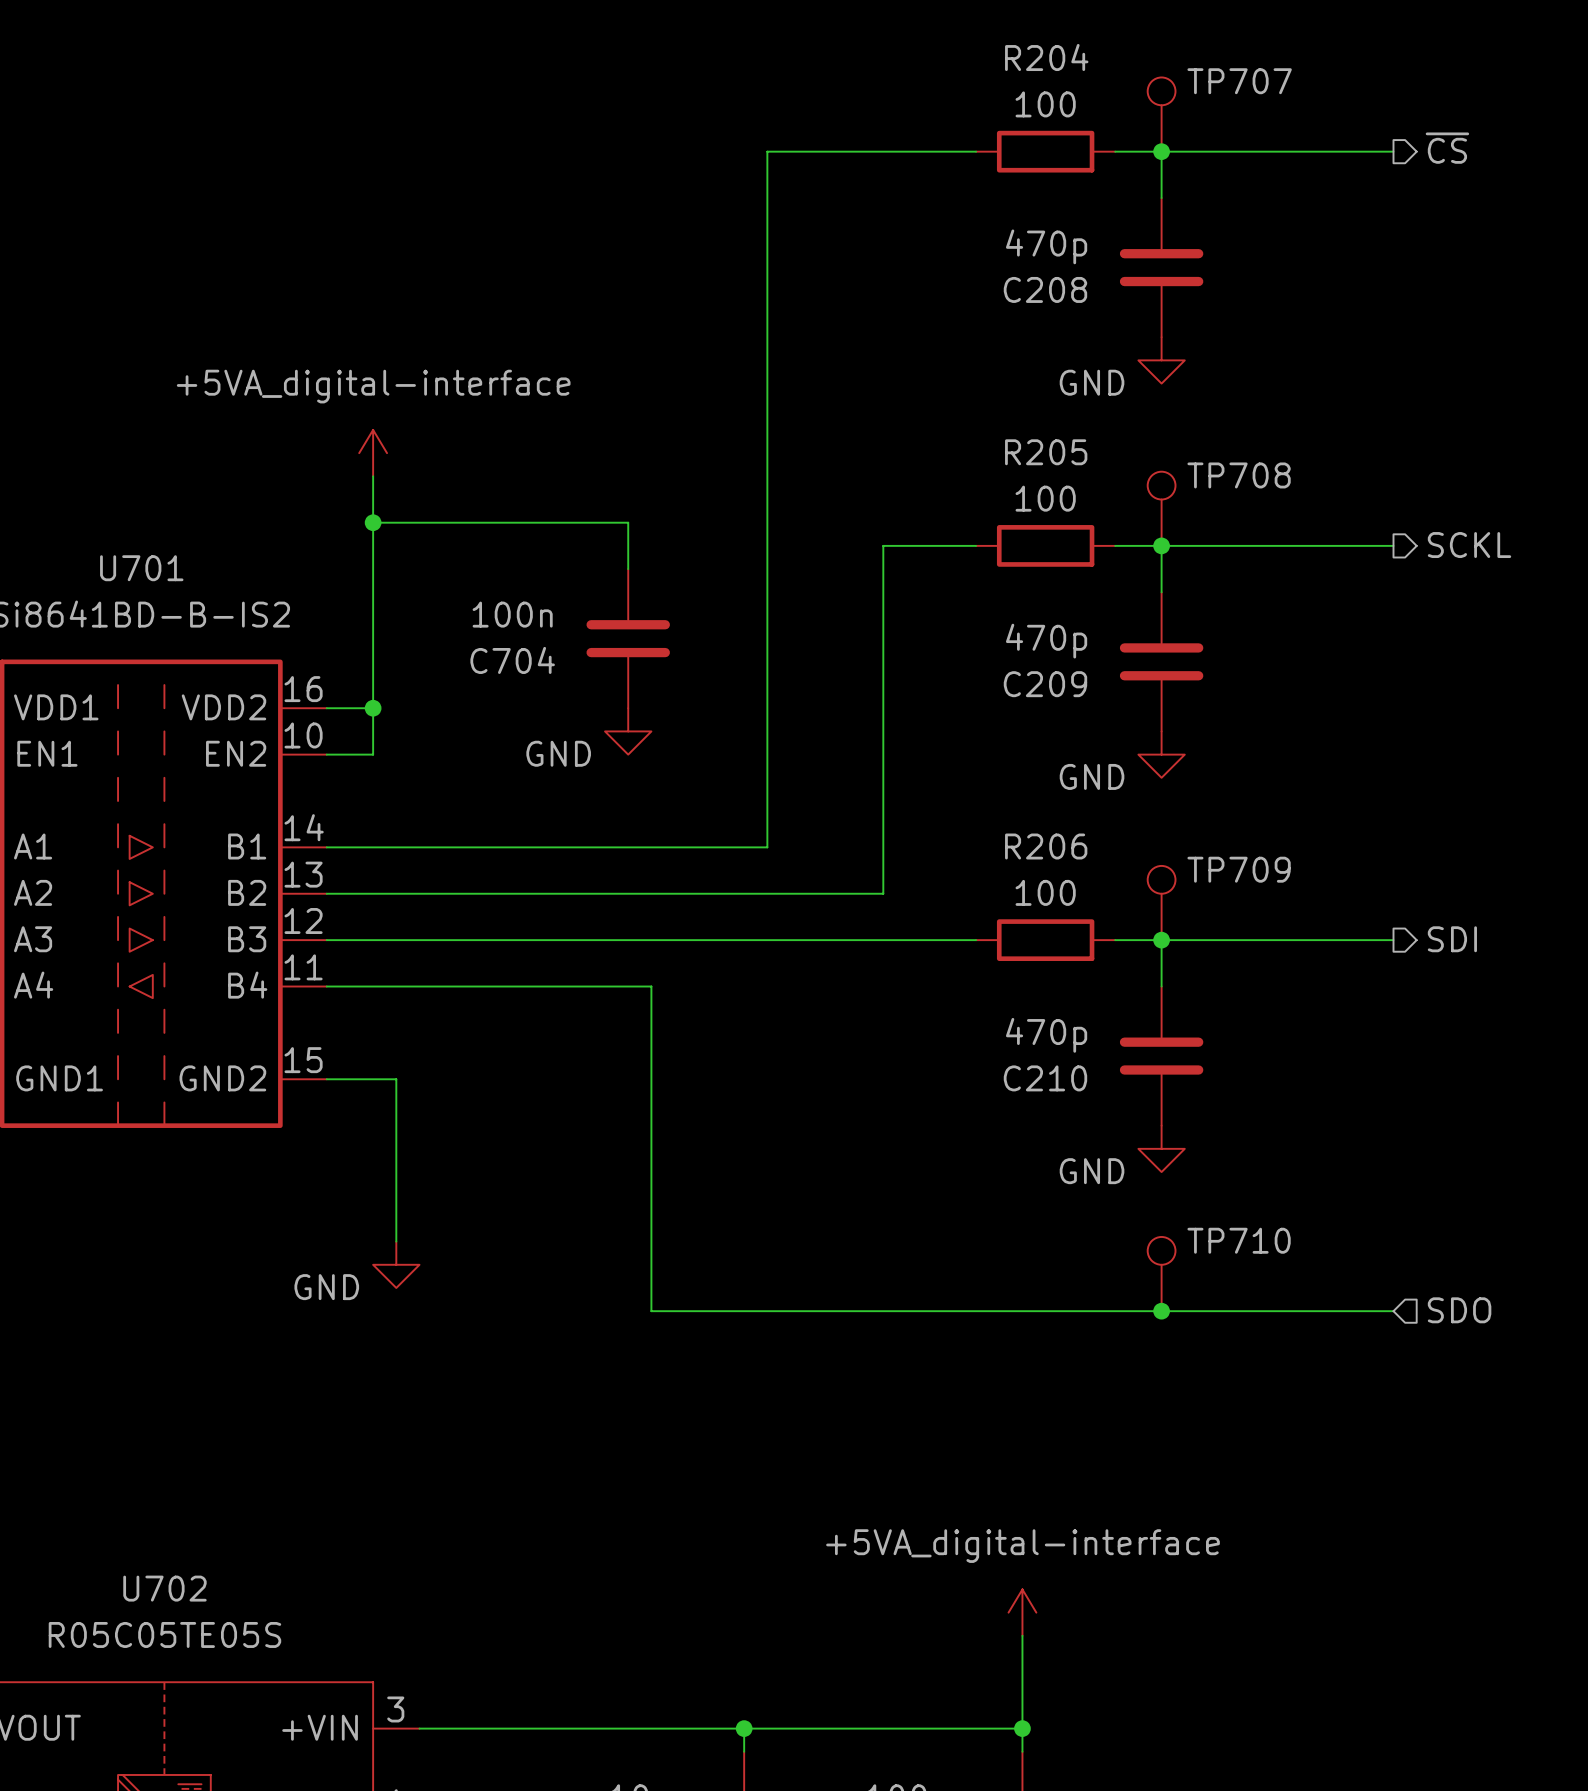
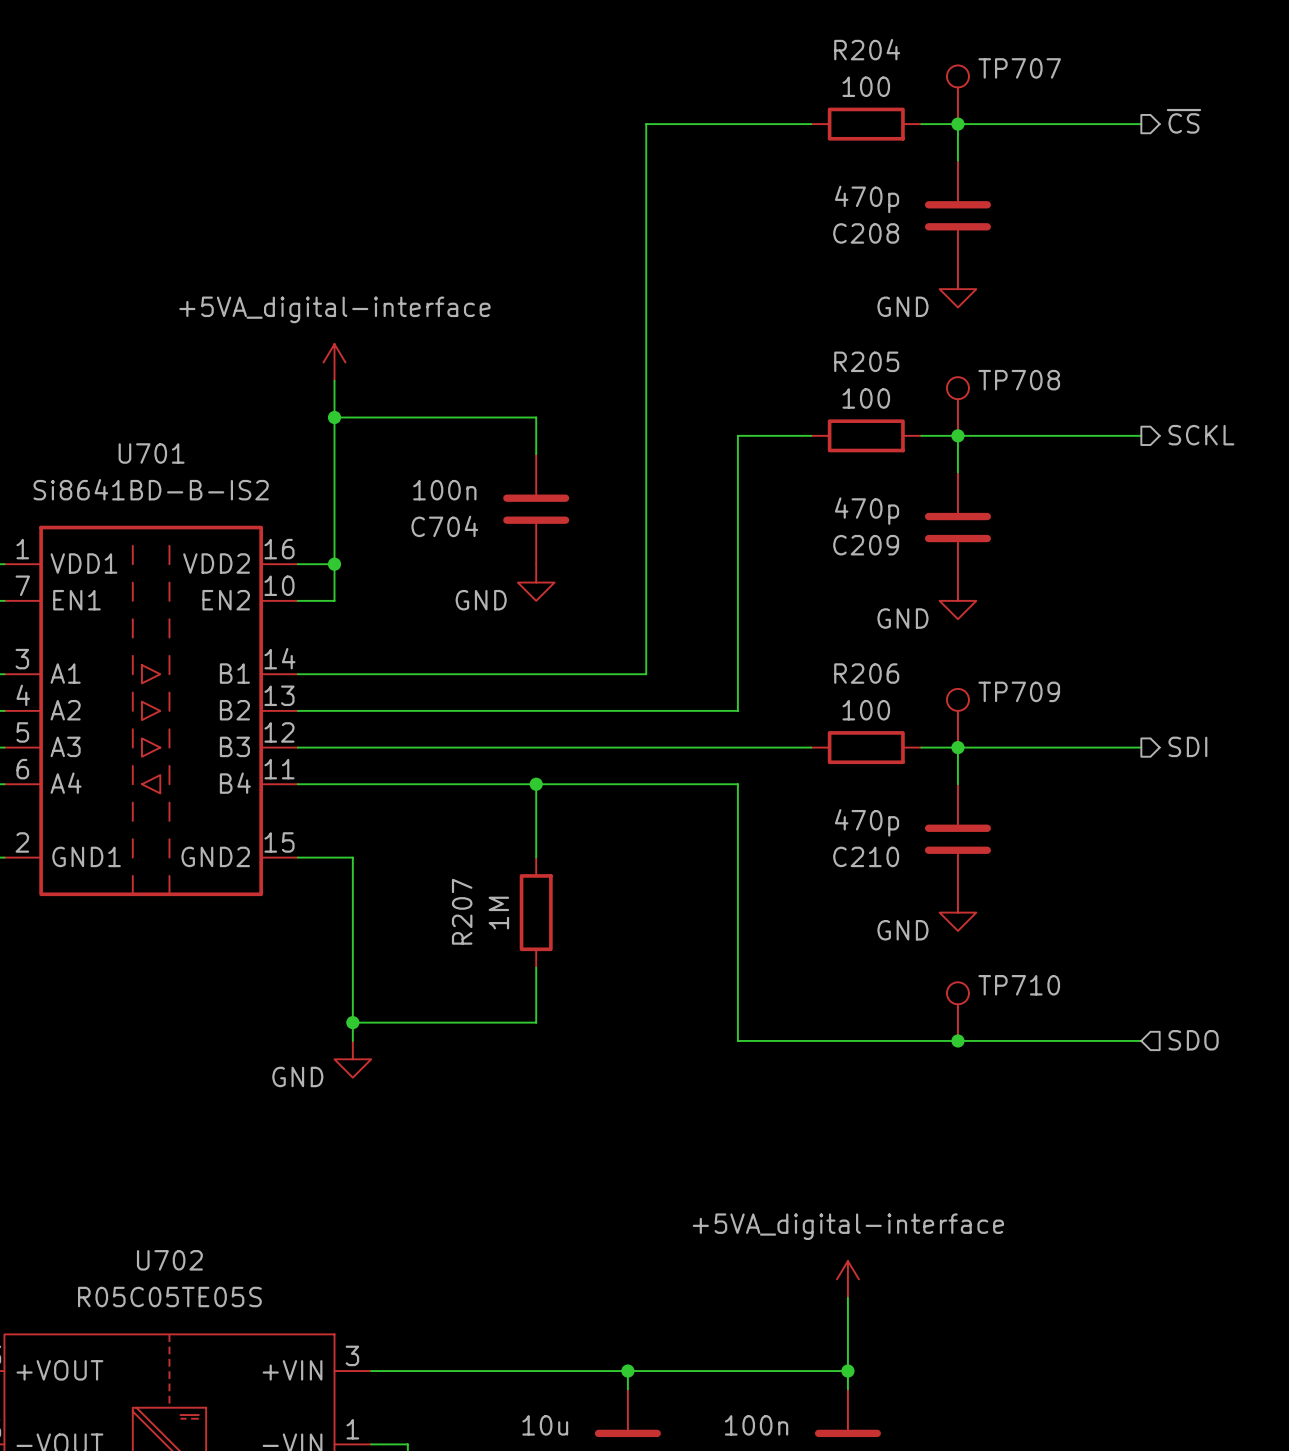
wire: none -> (536, 784) (536, 857)
junction: none -> (536, 784)
wire: (651, 986) (651, 1311) (883, 1311) -> (554, 784) (737, 784) (737, 1040)
R207: none -> 1M (536, 912)
wire: none -> (536, 967) (536, 1022) (352, 1022)
wire: none -> (352, 985) (352, 1040)
power symbol position: GND (396, 1264) -> GND (352, 1059)
junction: none -> (352, 1022)

